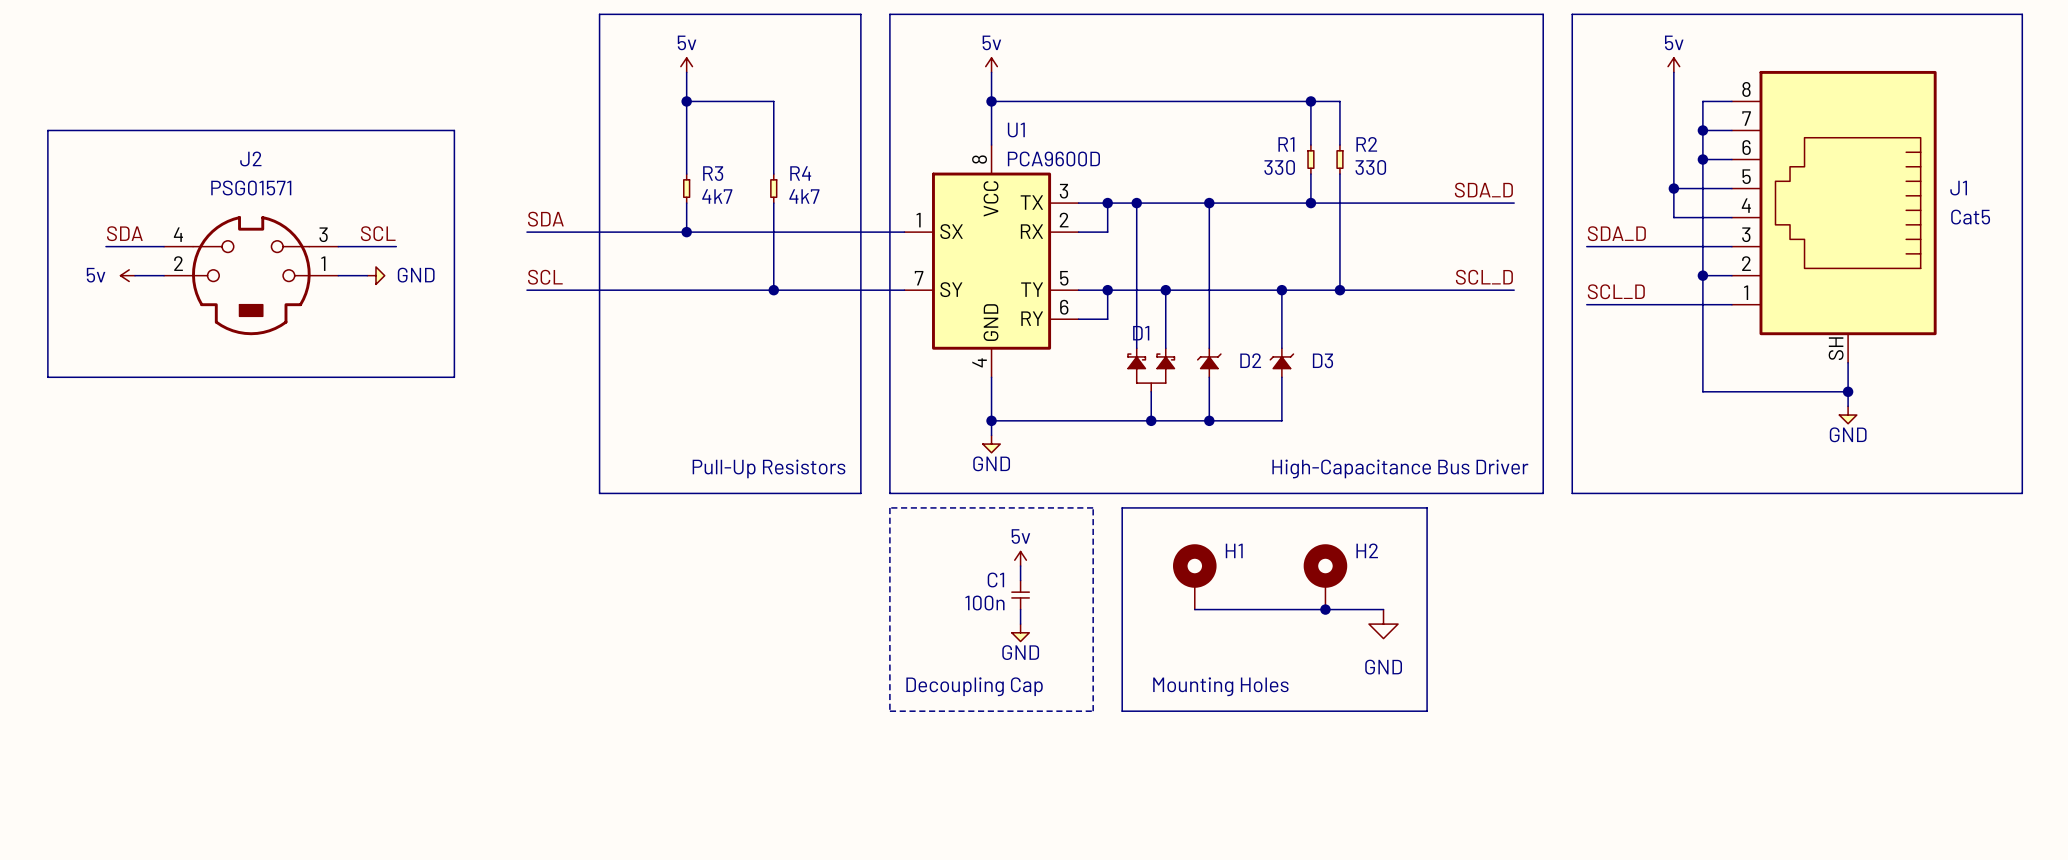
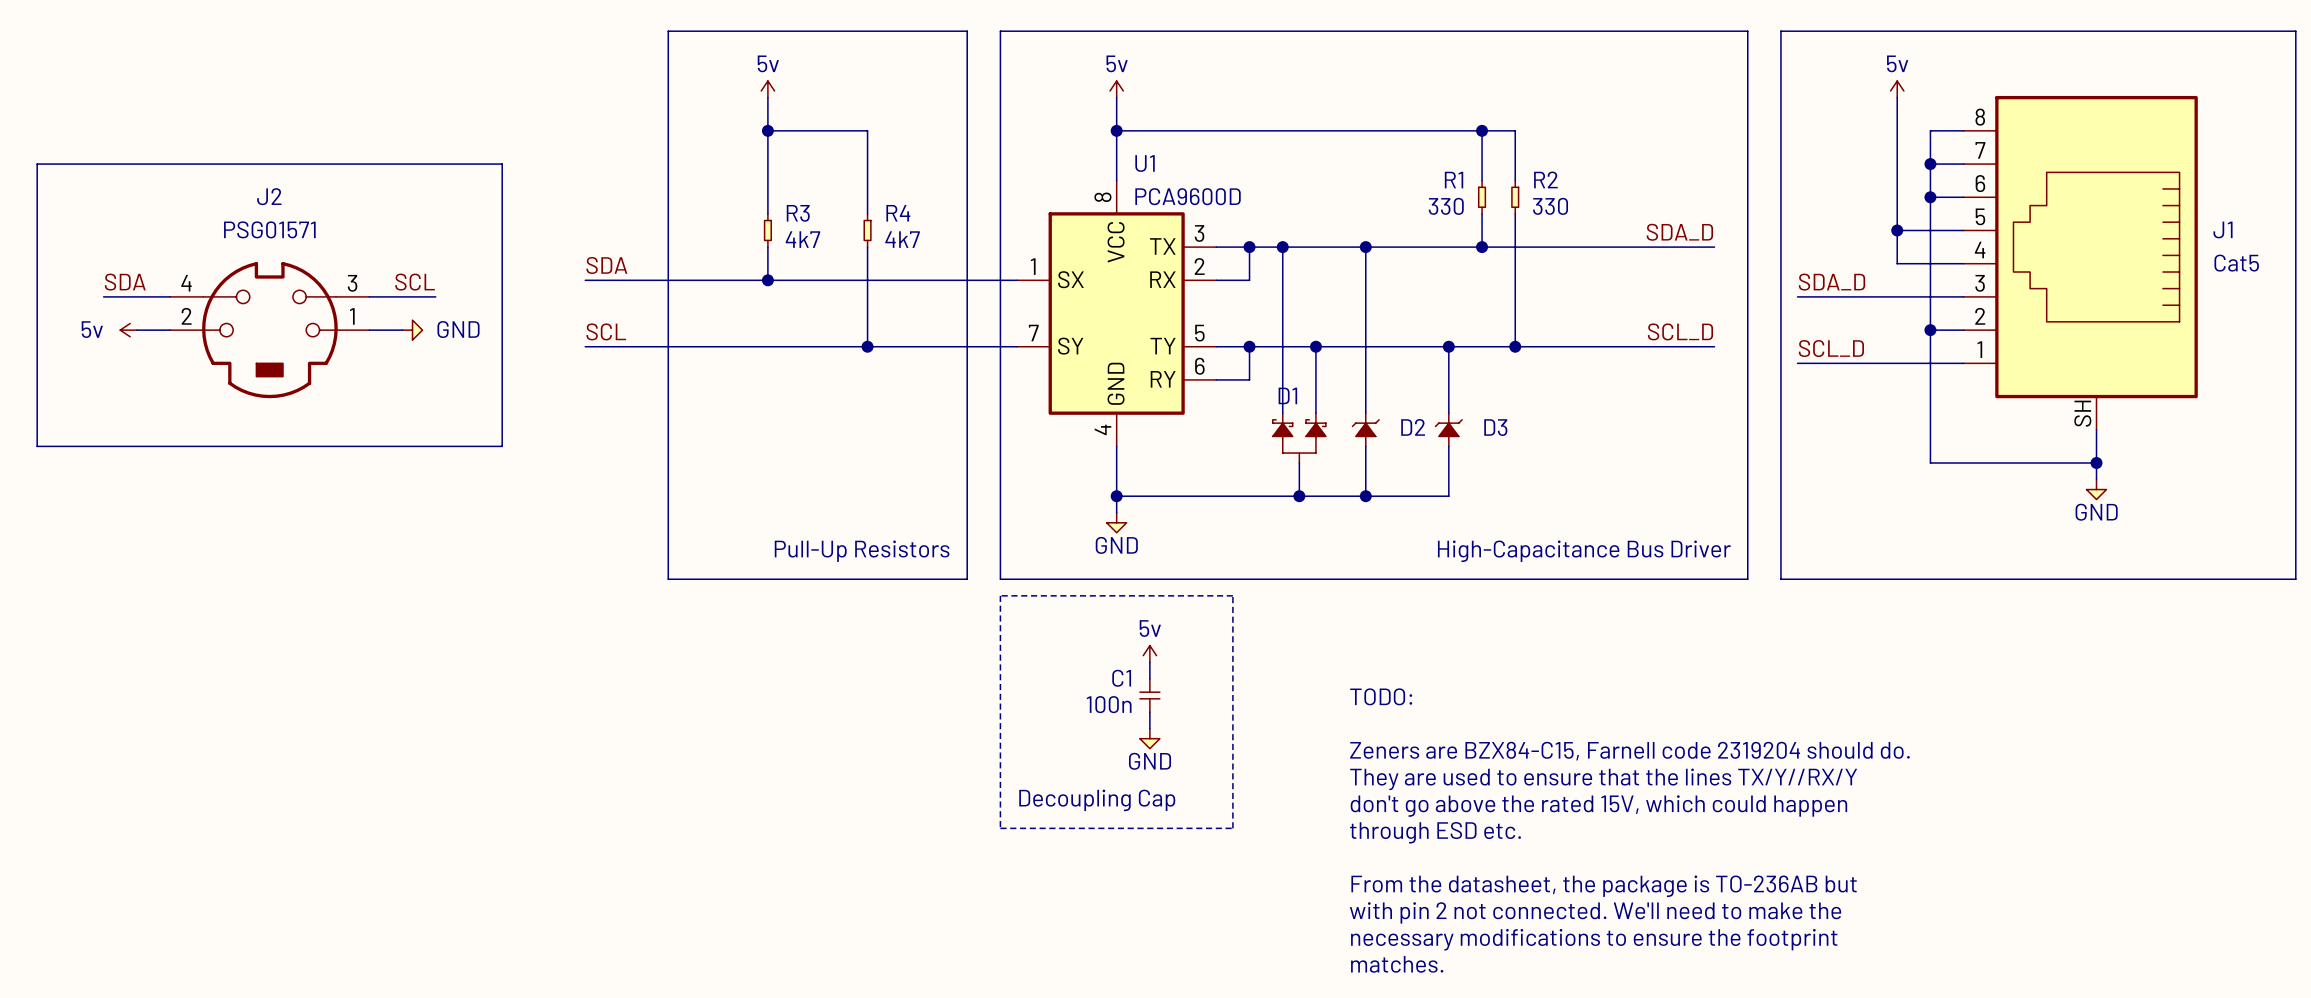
line: (1122, 507) (1427, 507) (1427, 711) (1122, 711) (1122, 507) -> none
H1: (1194, 576) -> none
H2: (1325, 576) -> none
text: none -> TODO: (1381, 696)
wire: (1194, 609) (1383, 609) -> none
junction: (1325, 609) -> none
power symbol: GND (1383, 624) -> none
text: none -> Zeners are BZX84-C15, Farnell code 2319204 should do. (1629, 751)
text: none -> They are used to ensure that the lines TX/Y//RX/Y (1603, 779)
text: Mounting Holes (1220, 686) -> none
text: none -> don't go above the rated 15V, which could happen (1598, 806)
text: none -> through ESD etc. (1435, 832)
text: none -> From the datasheet, the package is TO-236AB but (1604, 886)
text: none -> with pin 2 not connected. We'll need to make the (1595, 912)
text: none -> necessary modifications to ensure the footprint (1594, 939)
text: none -> matches. (1397, 964)

